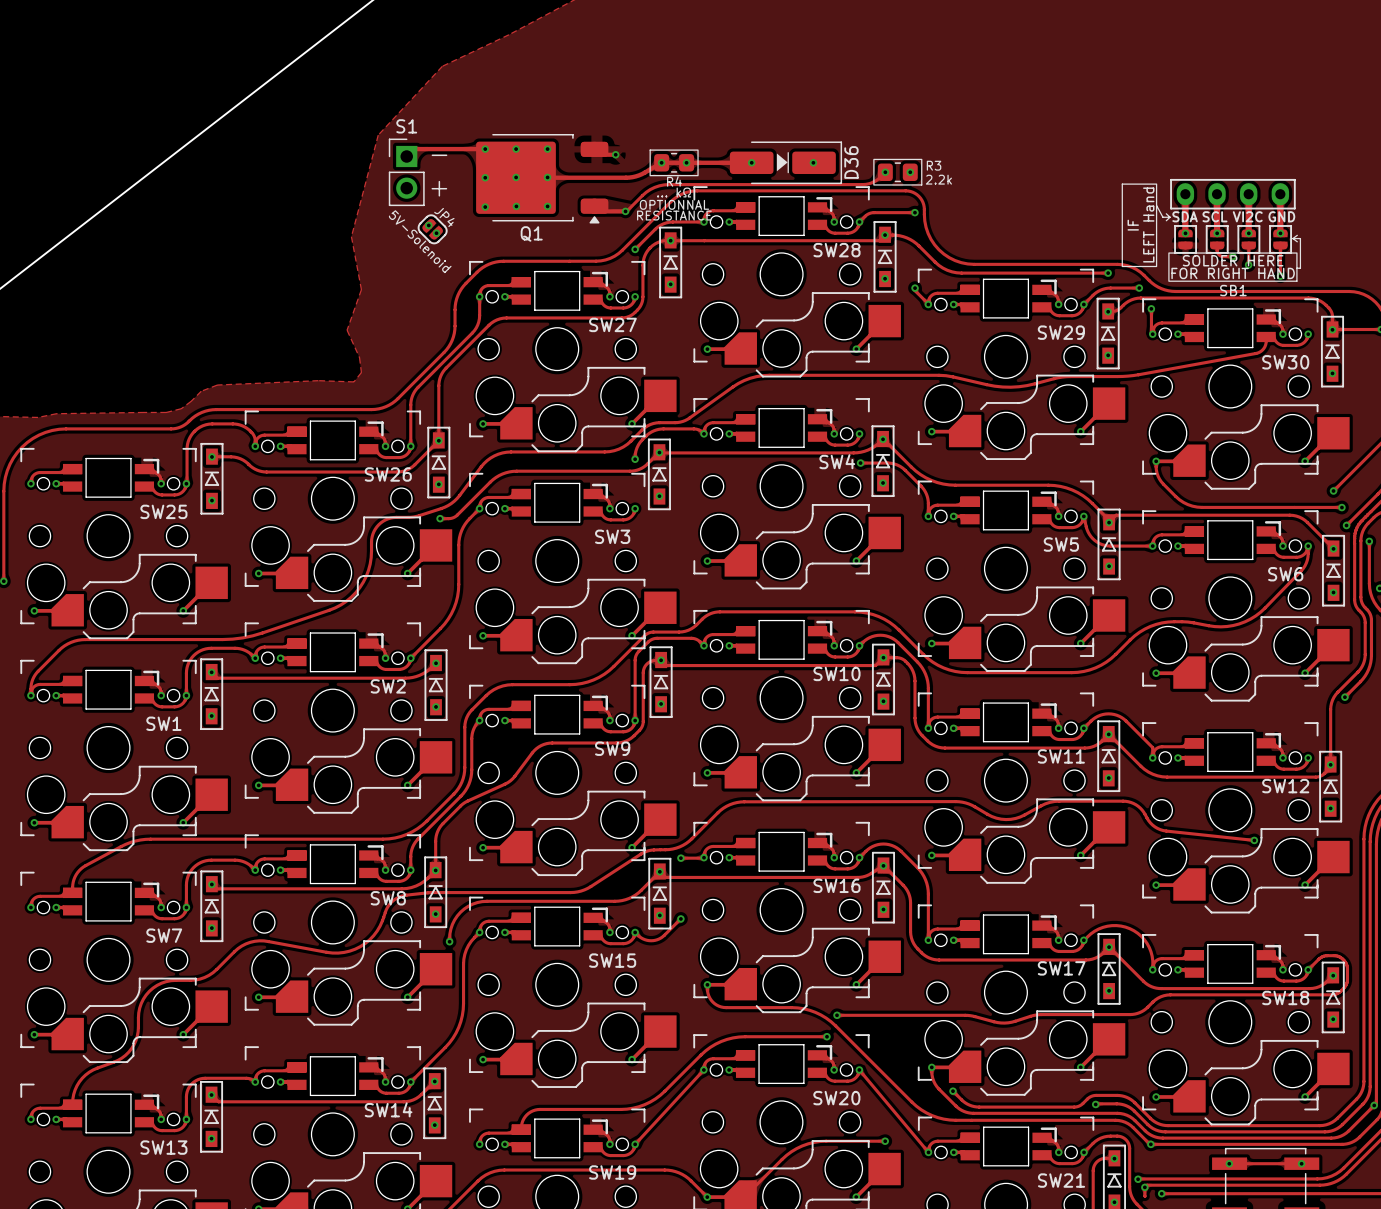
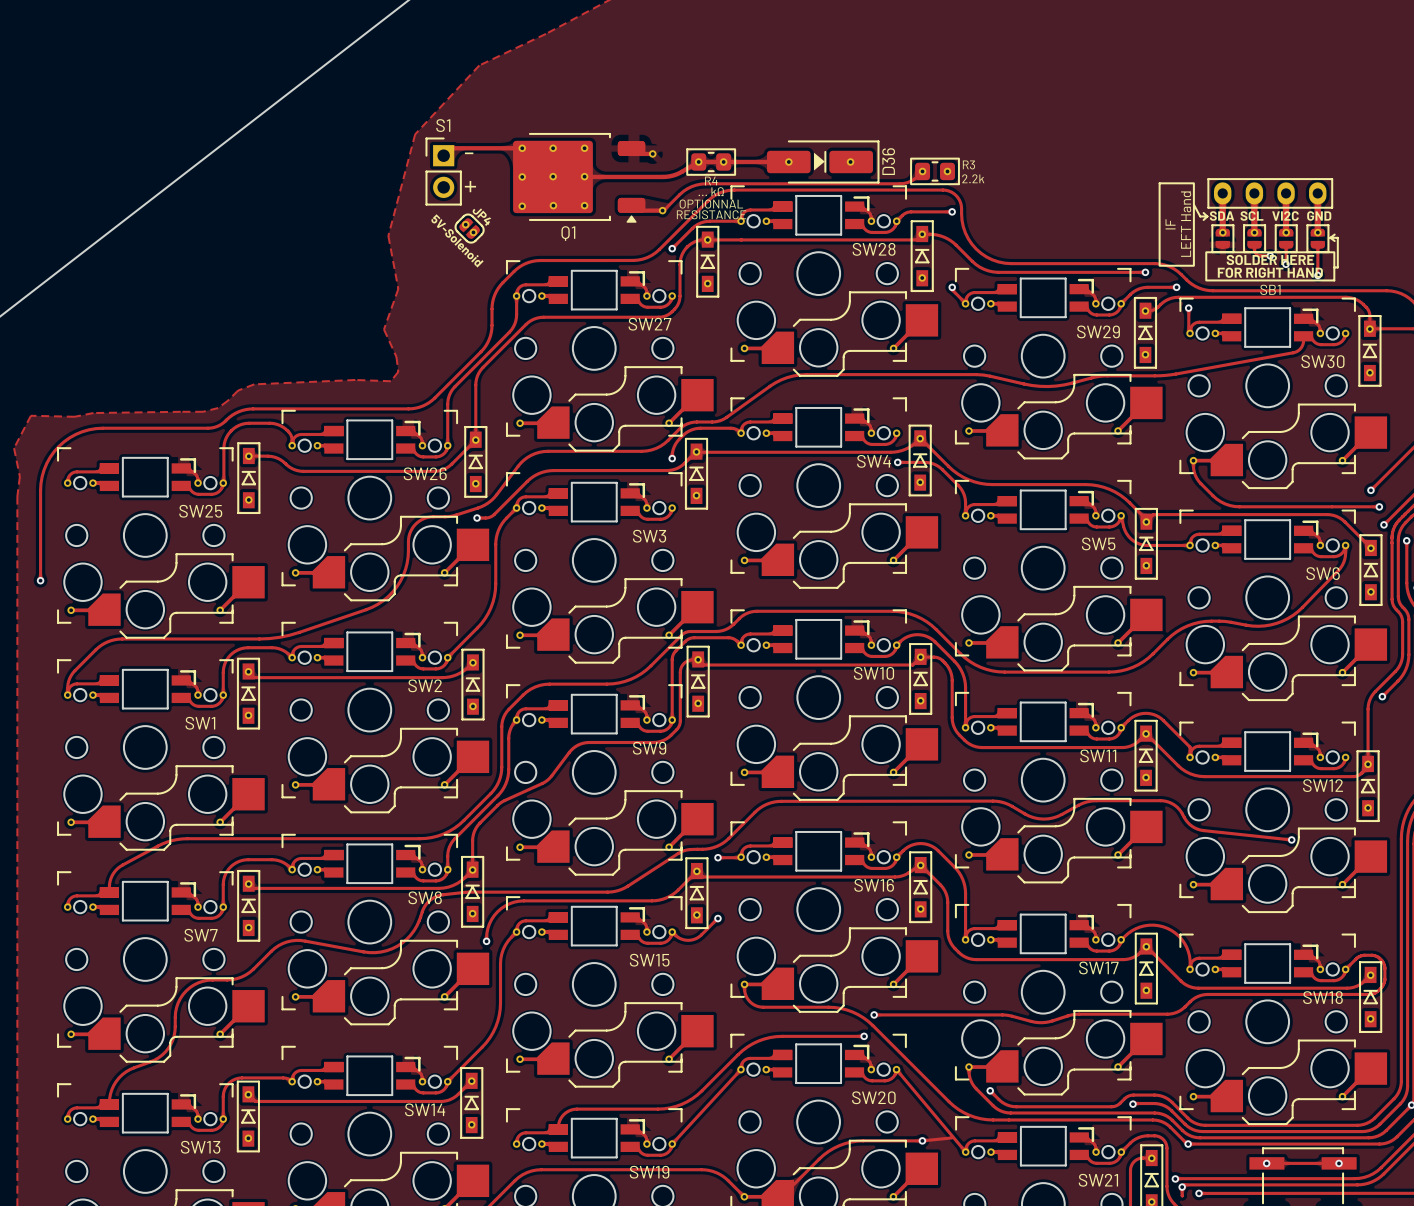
track: none -> (951, 1137) (922, 1140)

